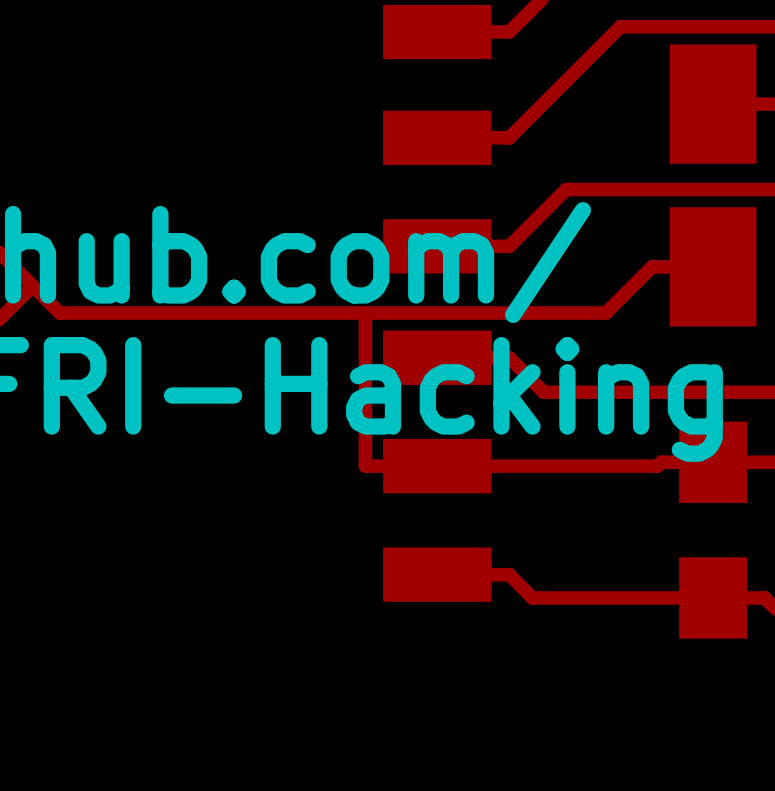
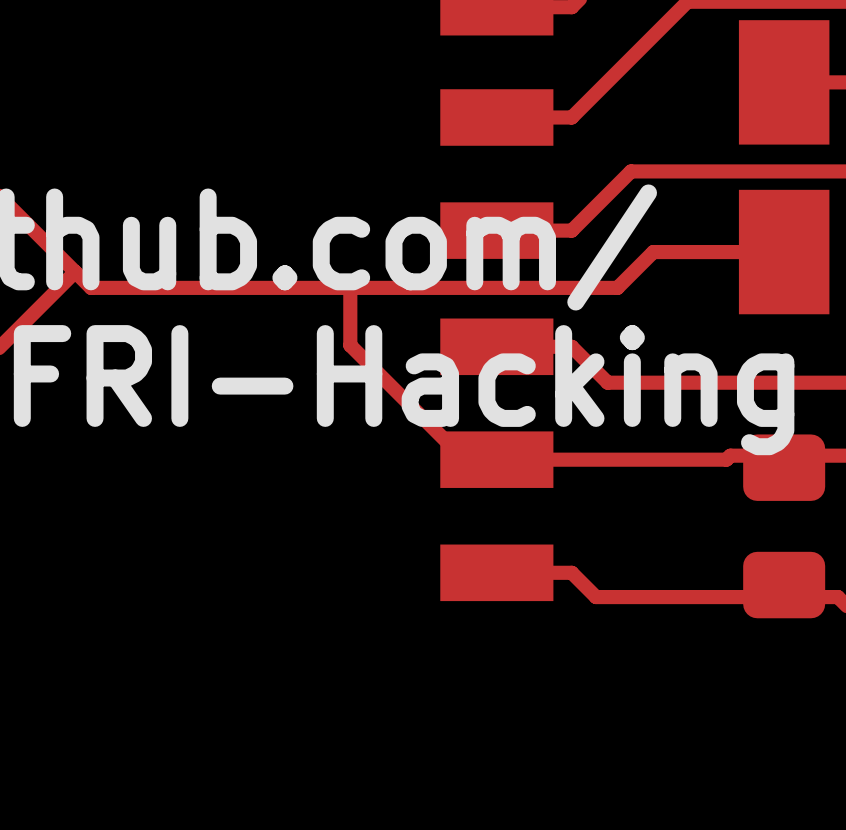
top track: (652, 266) (605, 313) (59, 313) (48, 301) -> (720, 252) (653, 252) (617, 287) (91, 287)
top track: (365, 313) (365, 466) (406, 466) -> (350, 287) (350, 345) (464, 459)
part footprint: [679, 421, 747, 639] -> [743, 434, 826, 619]

